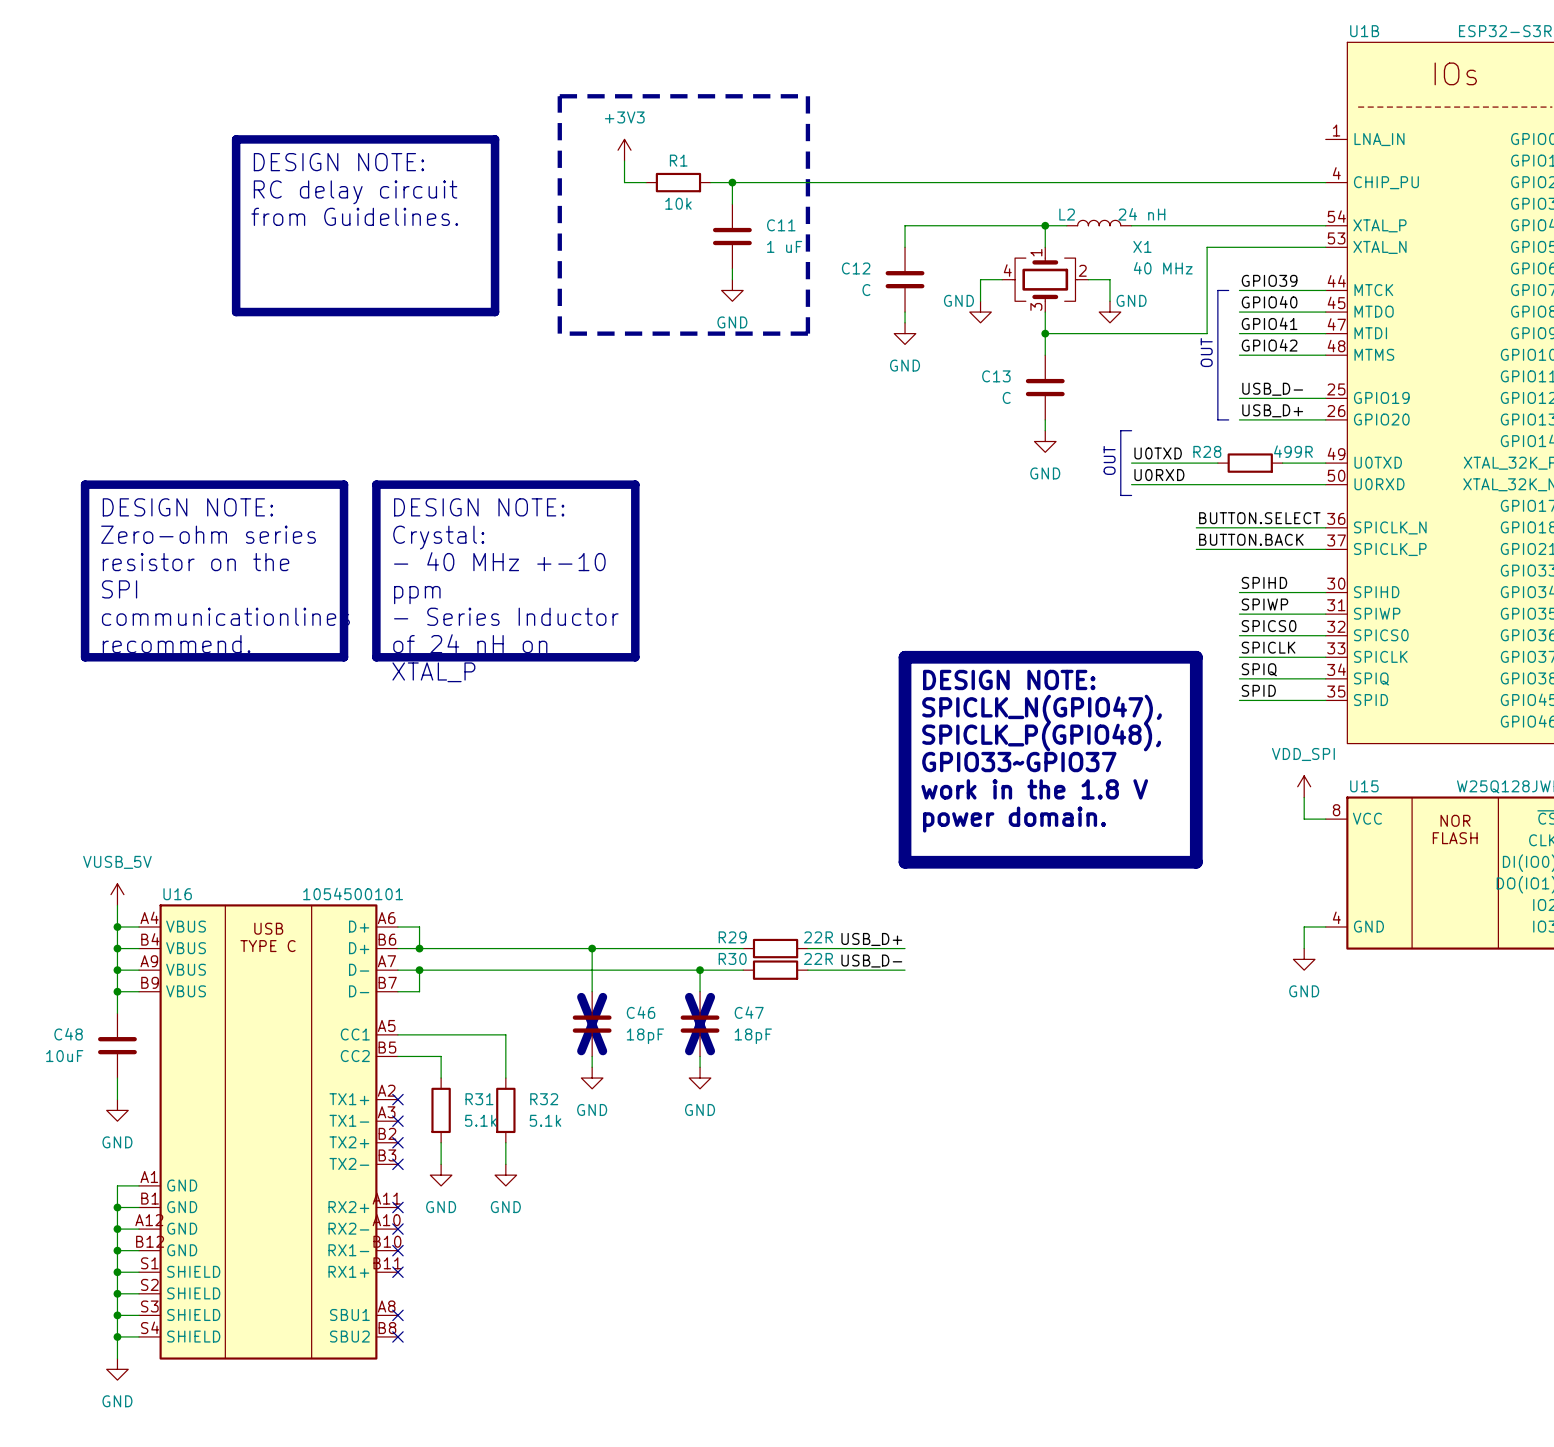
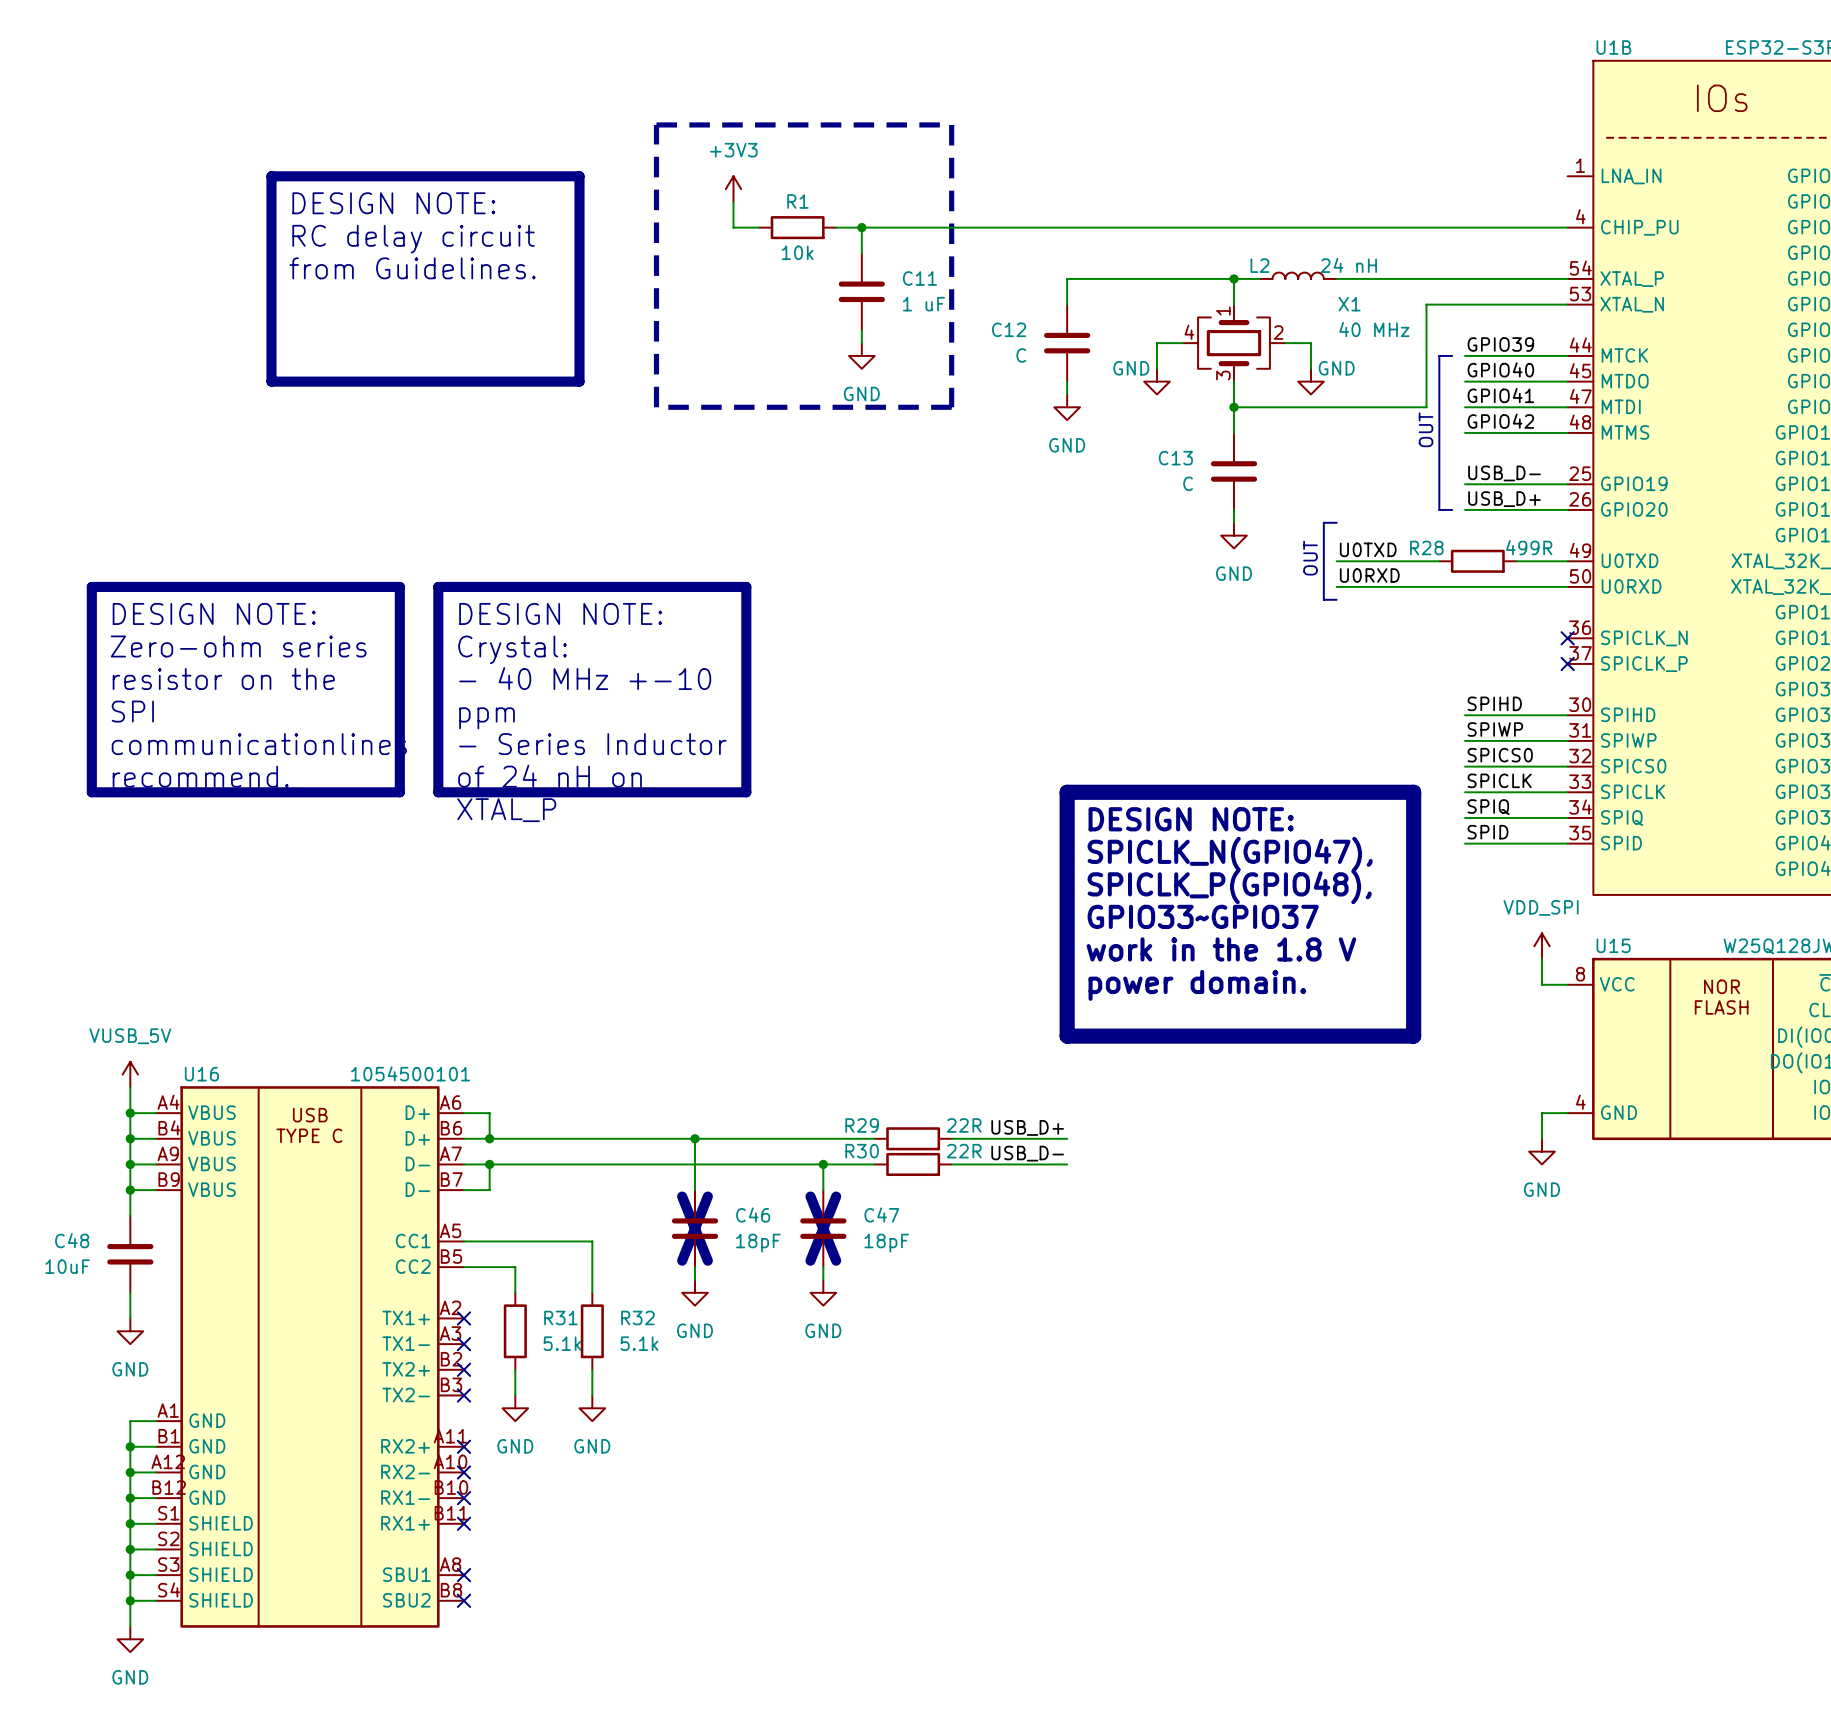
label: BUTTON.SELECT (1259, 518) -> none
wire: (1196, 527) (1325, 527) -> none
no-connect mark: none -> (1567, 638)
label: BUTTON.BACK (1251, 539) -> none
wire: (1196, 549) (1325, 549) -> none
no-connect mark: none -> (1567, 663)

